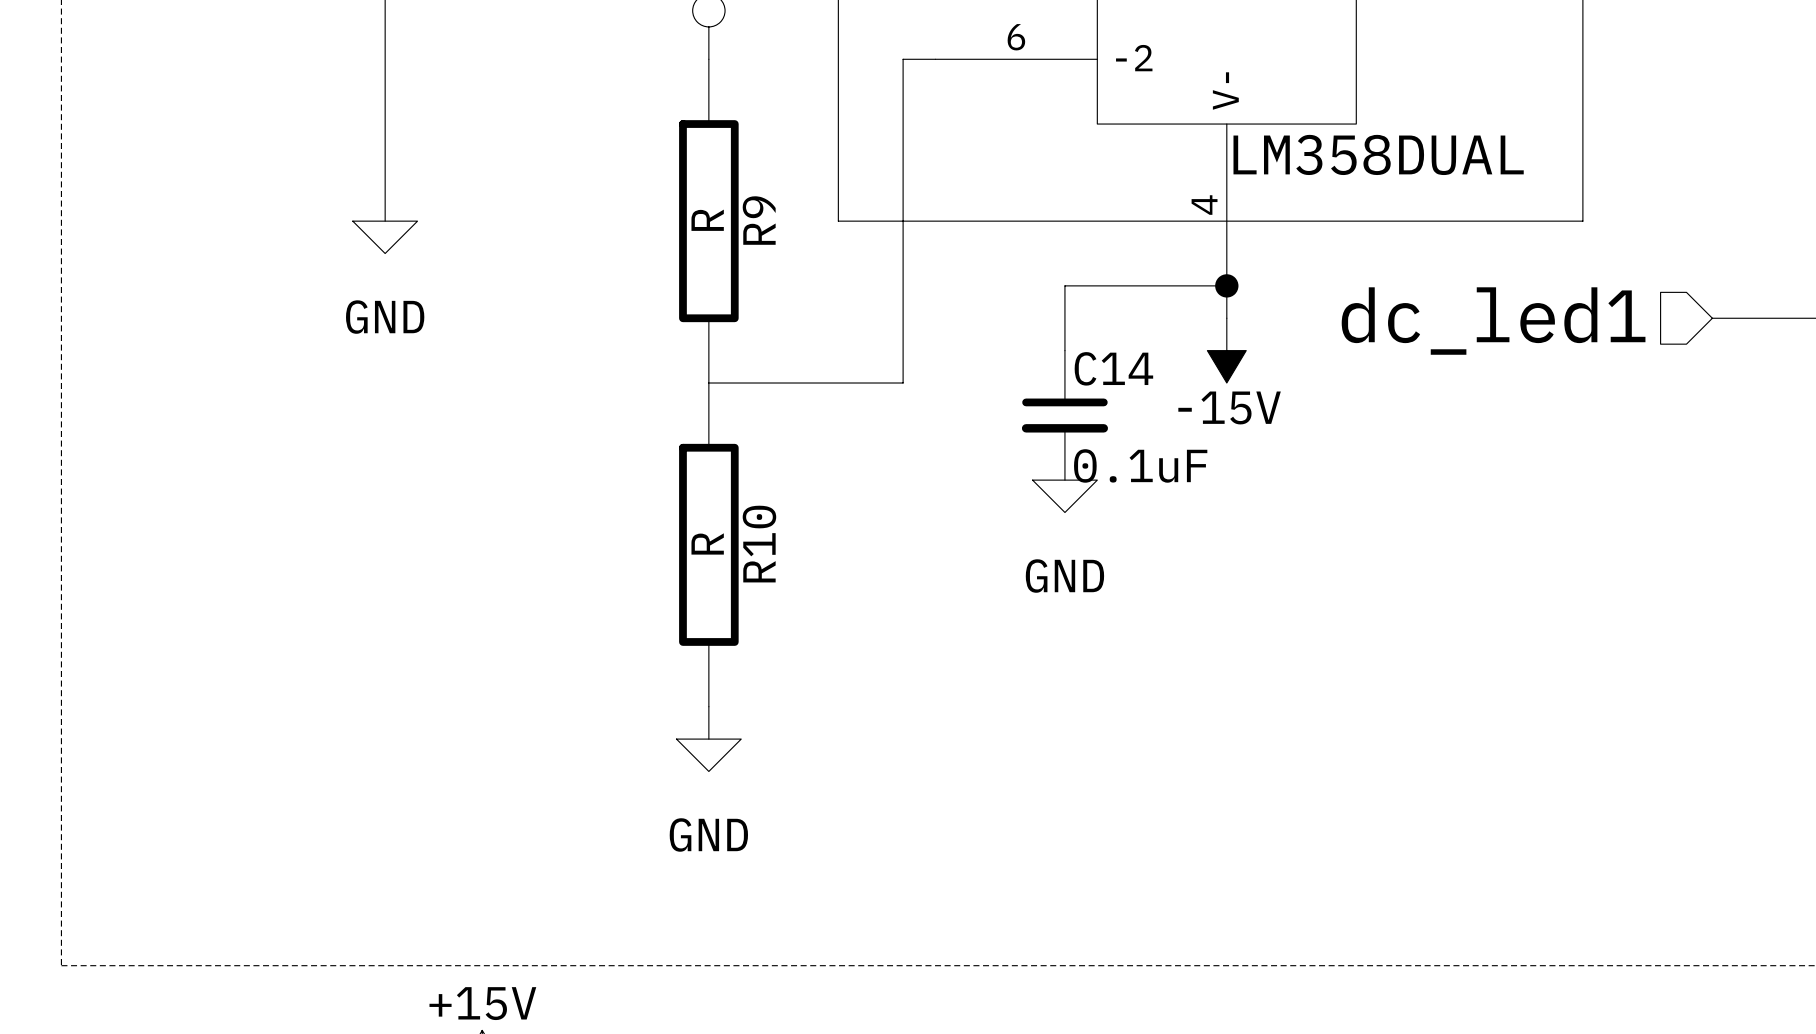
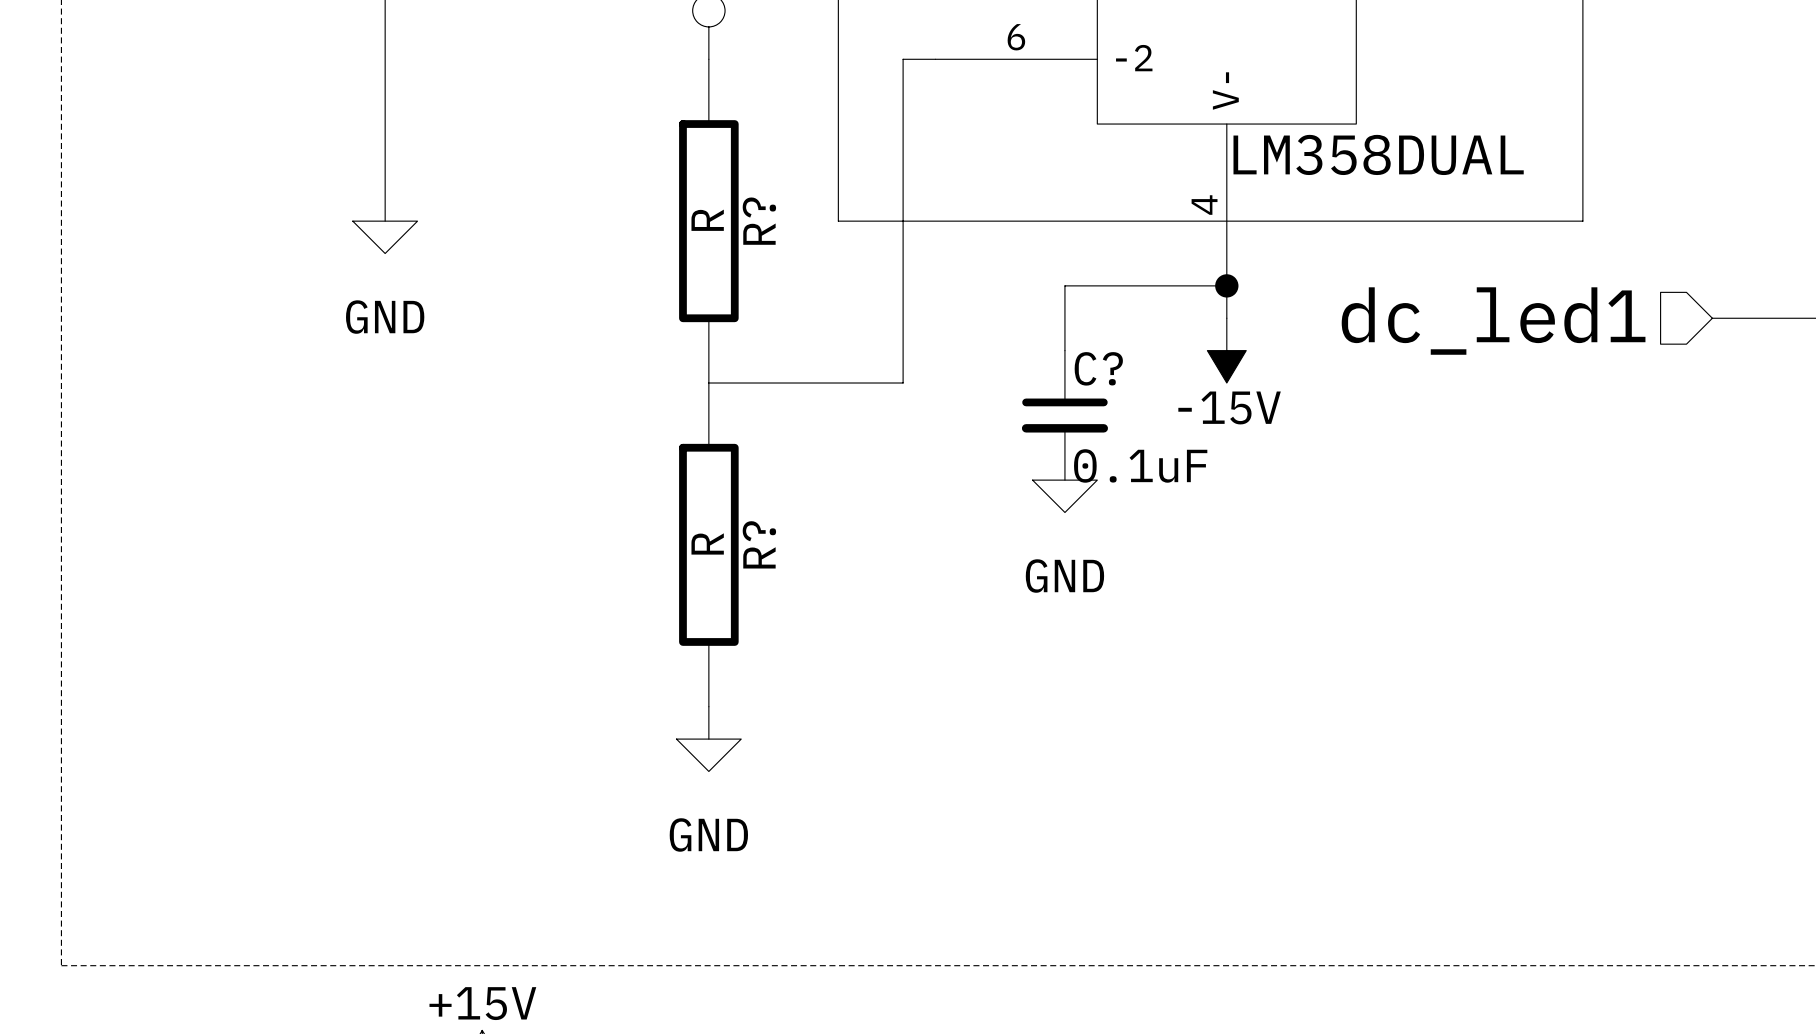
R9 name: R9 (759, 220) -> R? (759, 221)
C14 name: C14 (1113, 368) -> C? (1098, 368)
R10 name: R10 (759, 544) -> R? (759, 544)

